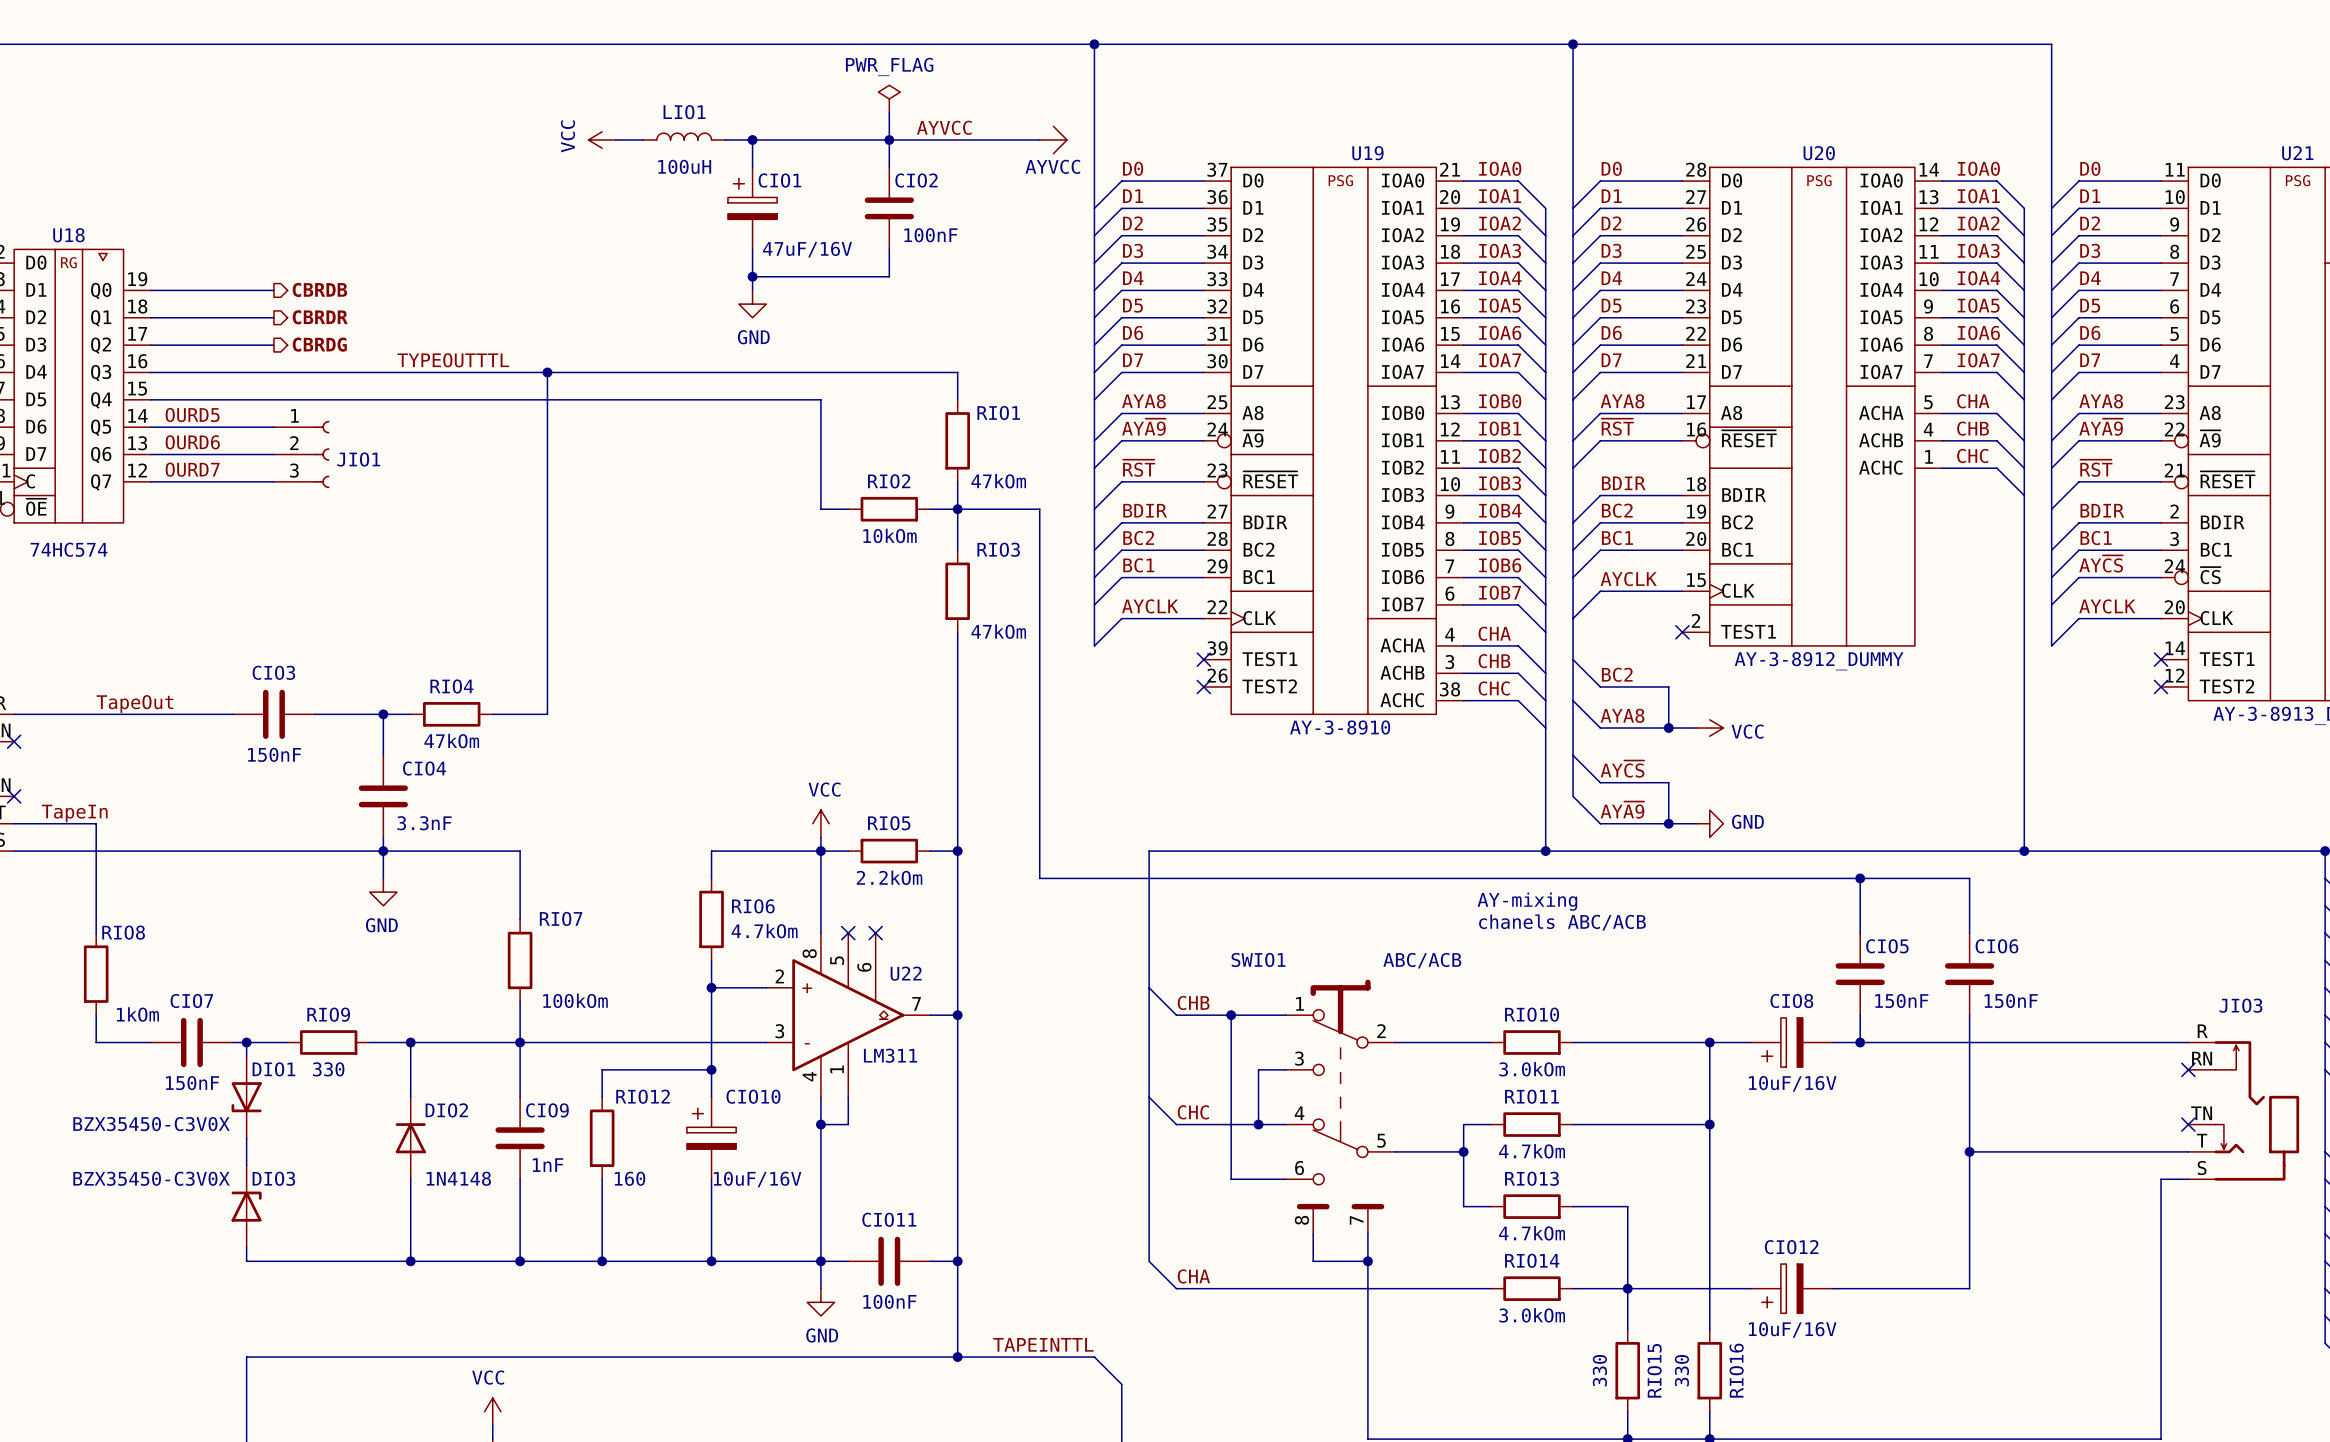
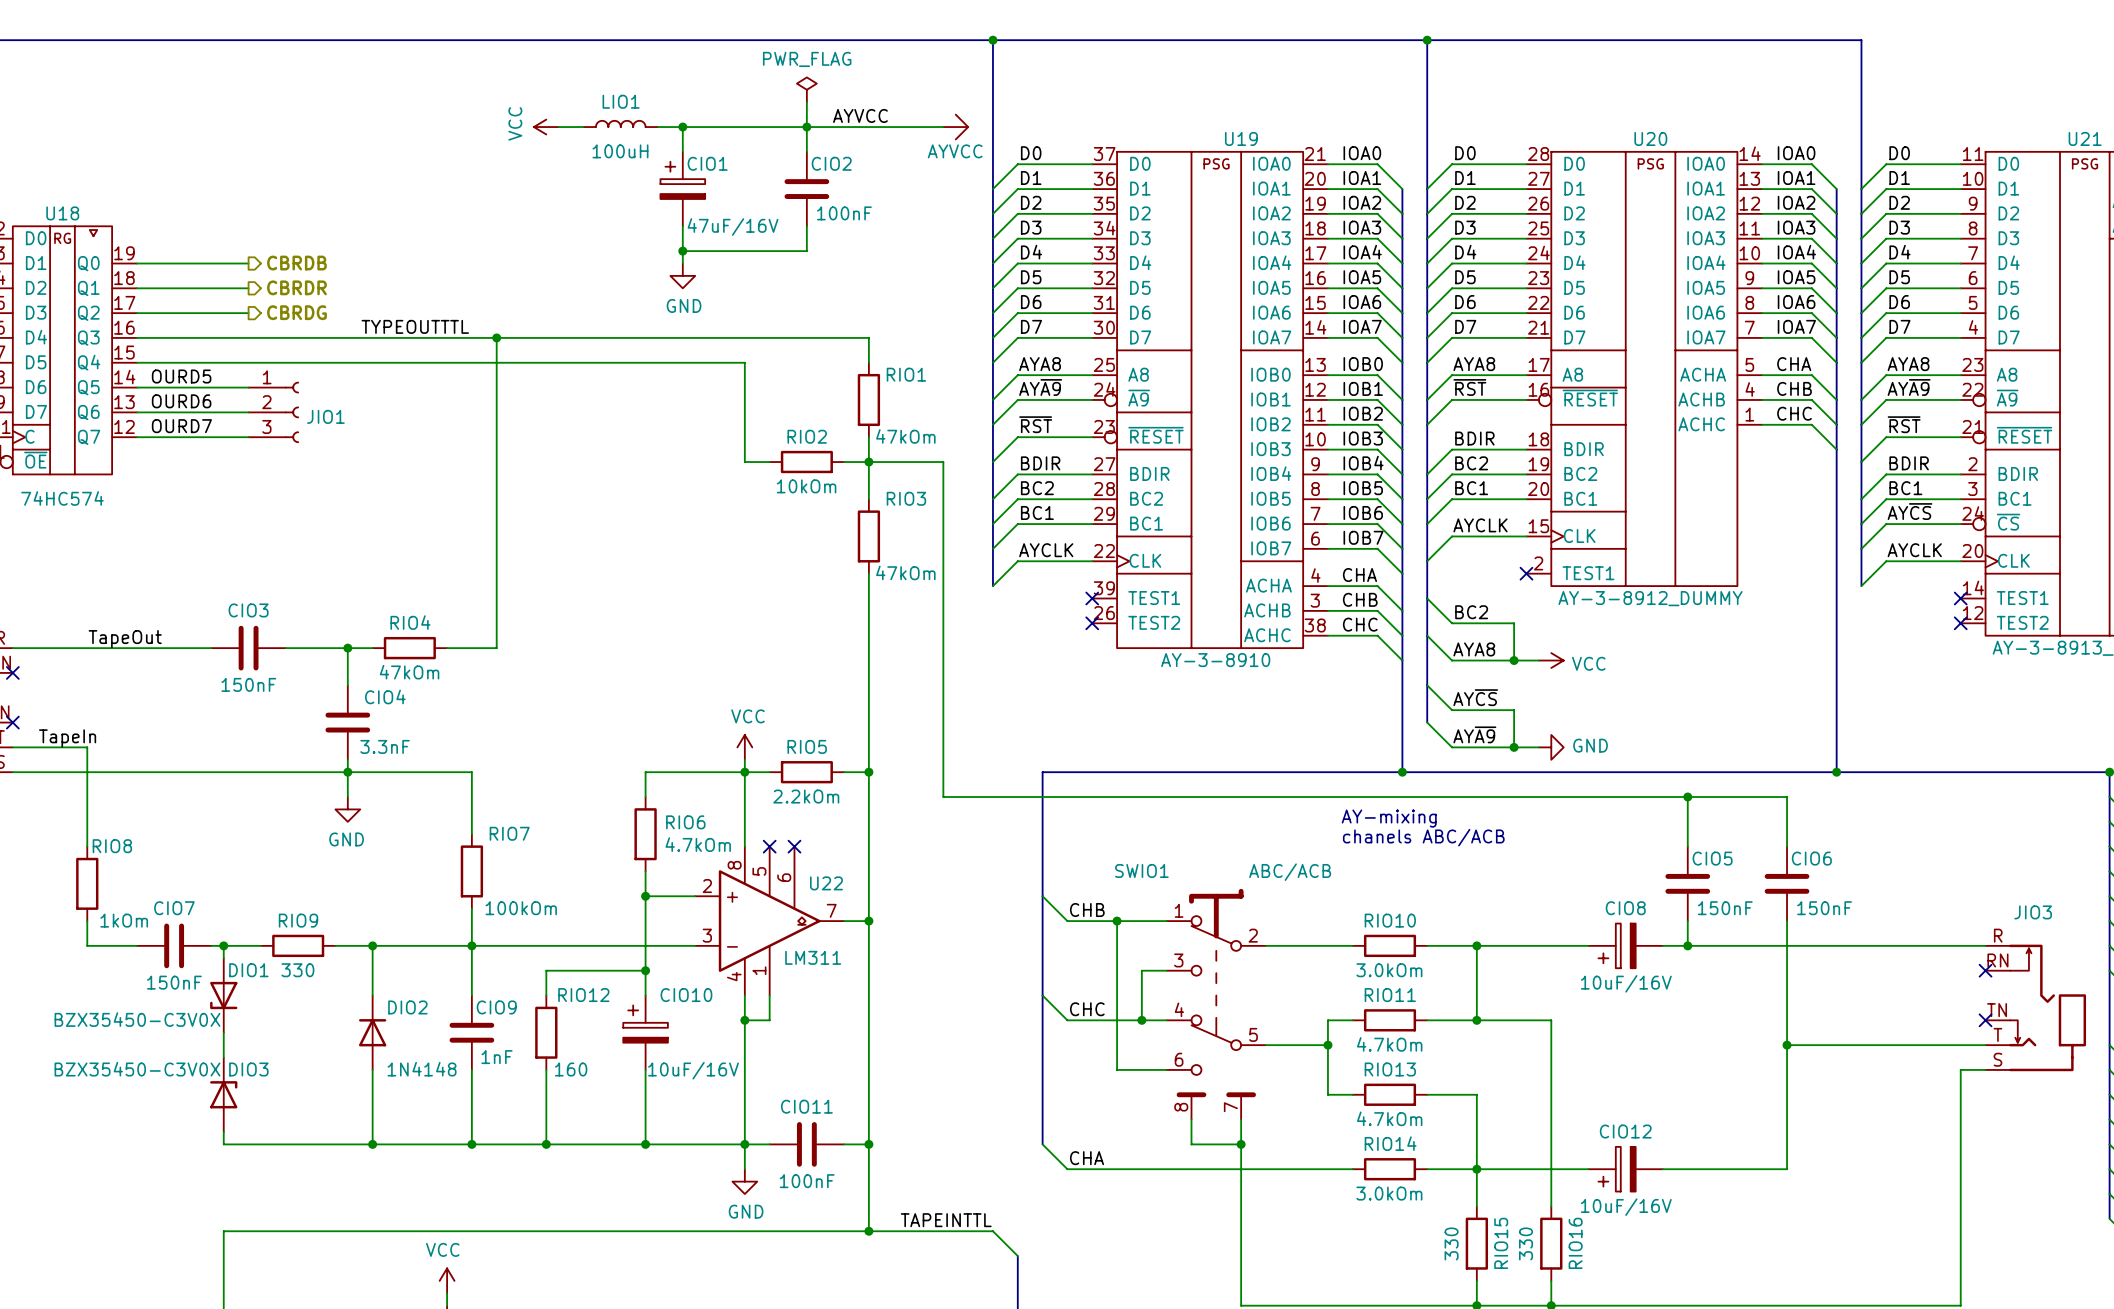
junction: none -> (1476, 945)
wire: (1709, 1042) (1709, 1124) -> (1476, 945) (1476, 1020)
junction: (1709, 1042) -> none
junction: none -> (1476, 1020)
junction: (1709, 1124) -> none

